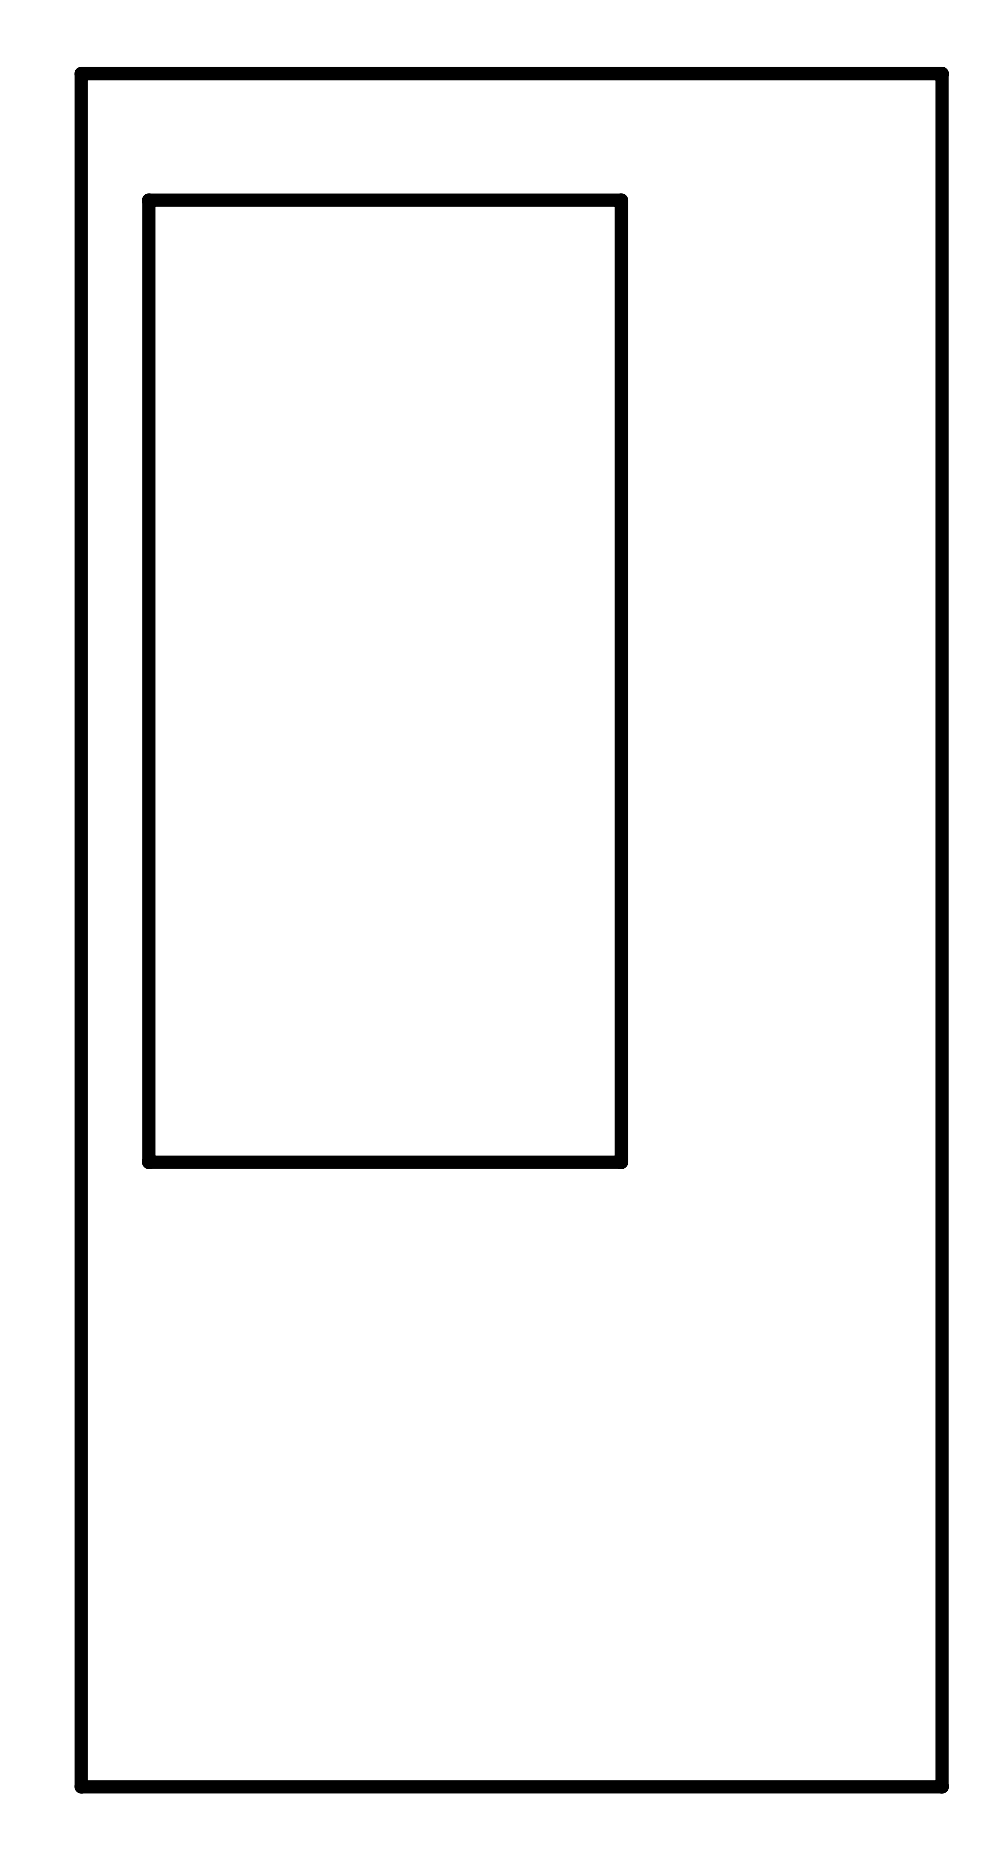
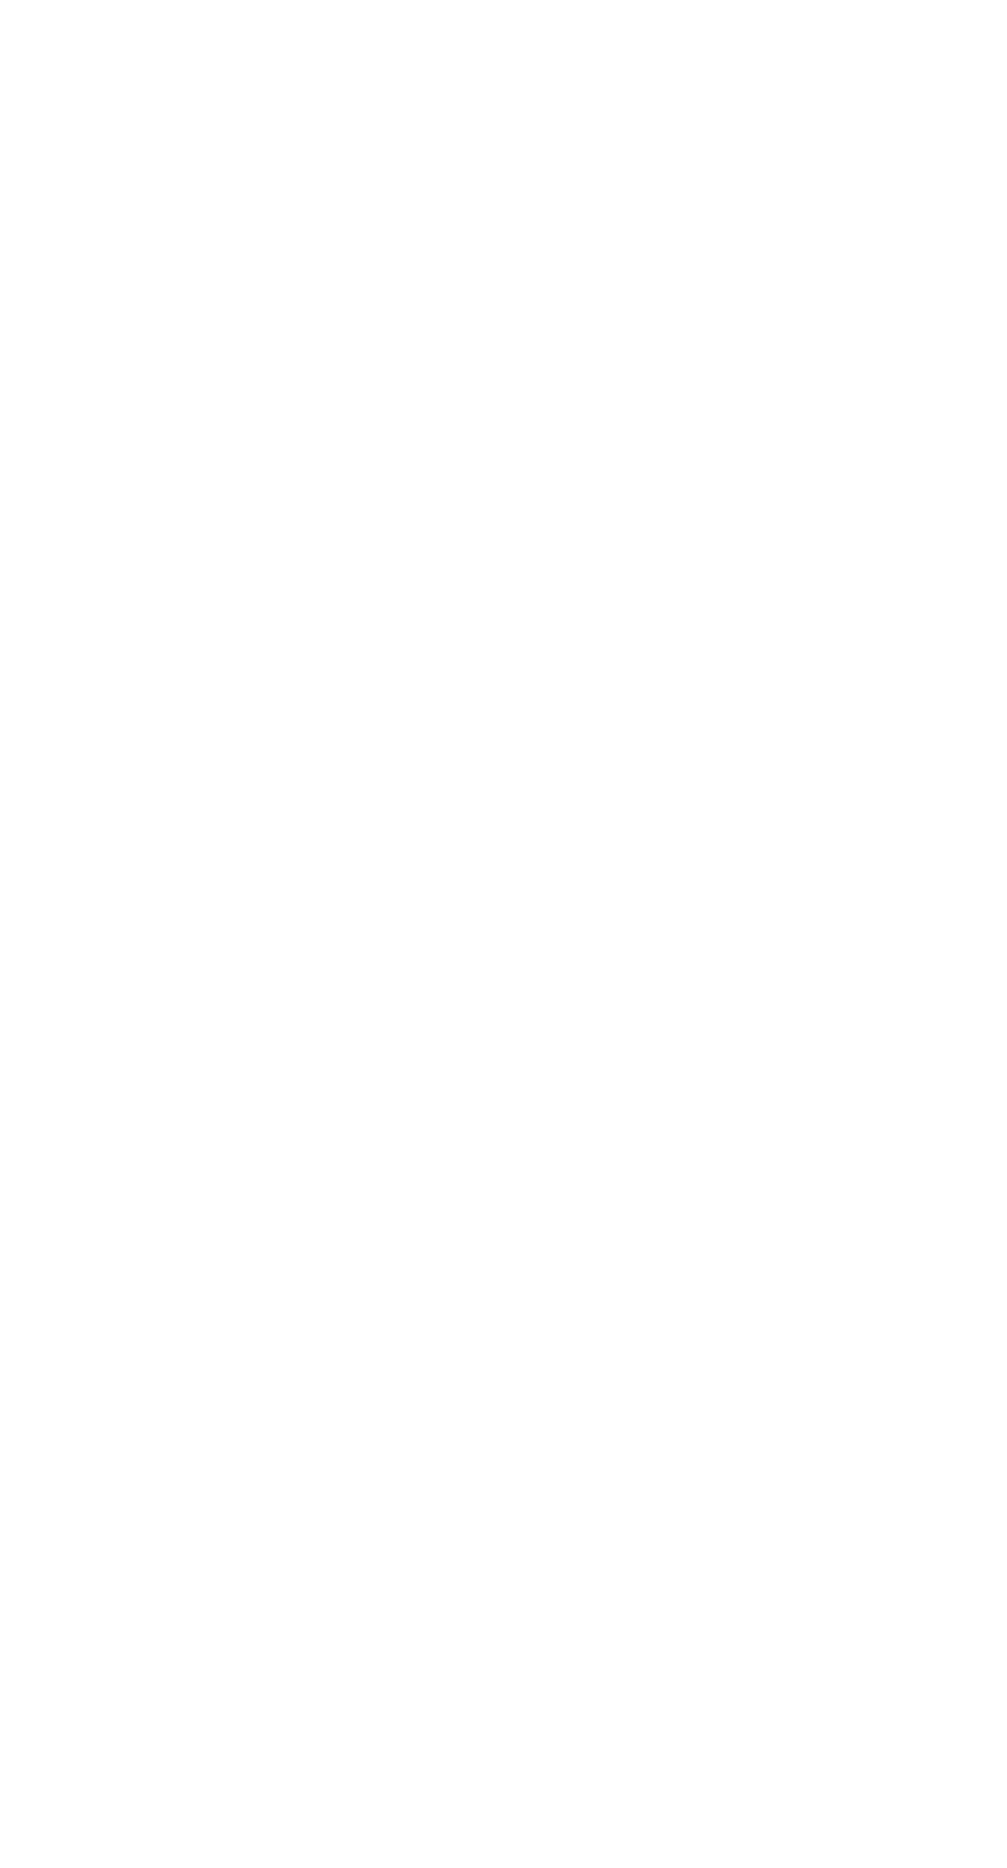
board edge: (81, 73) (81, 1786) (942, 1786) (942, 73) (81, 73) -> none
board edge: (148, 200) (148, 1162) (621, 1162) (621, 200) (148, 200) -> none

